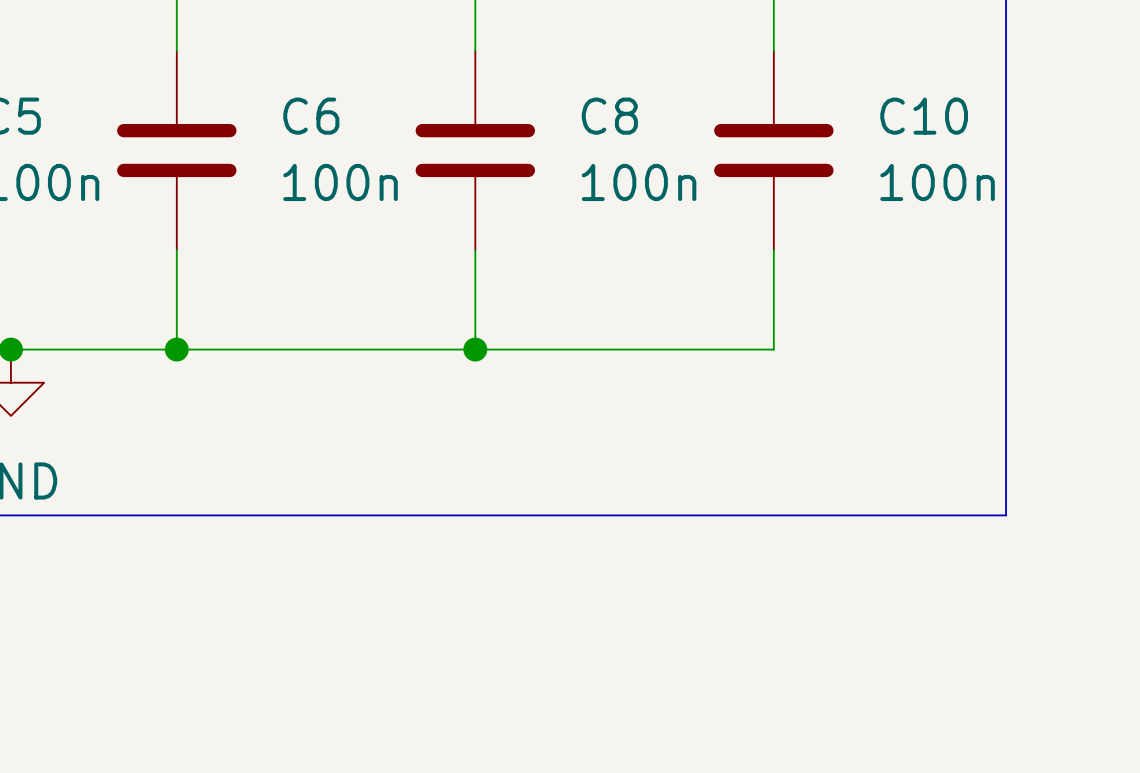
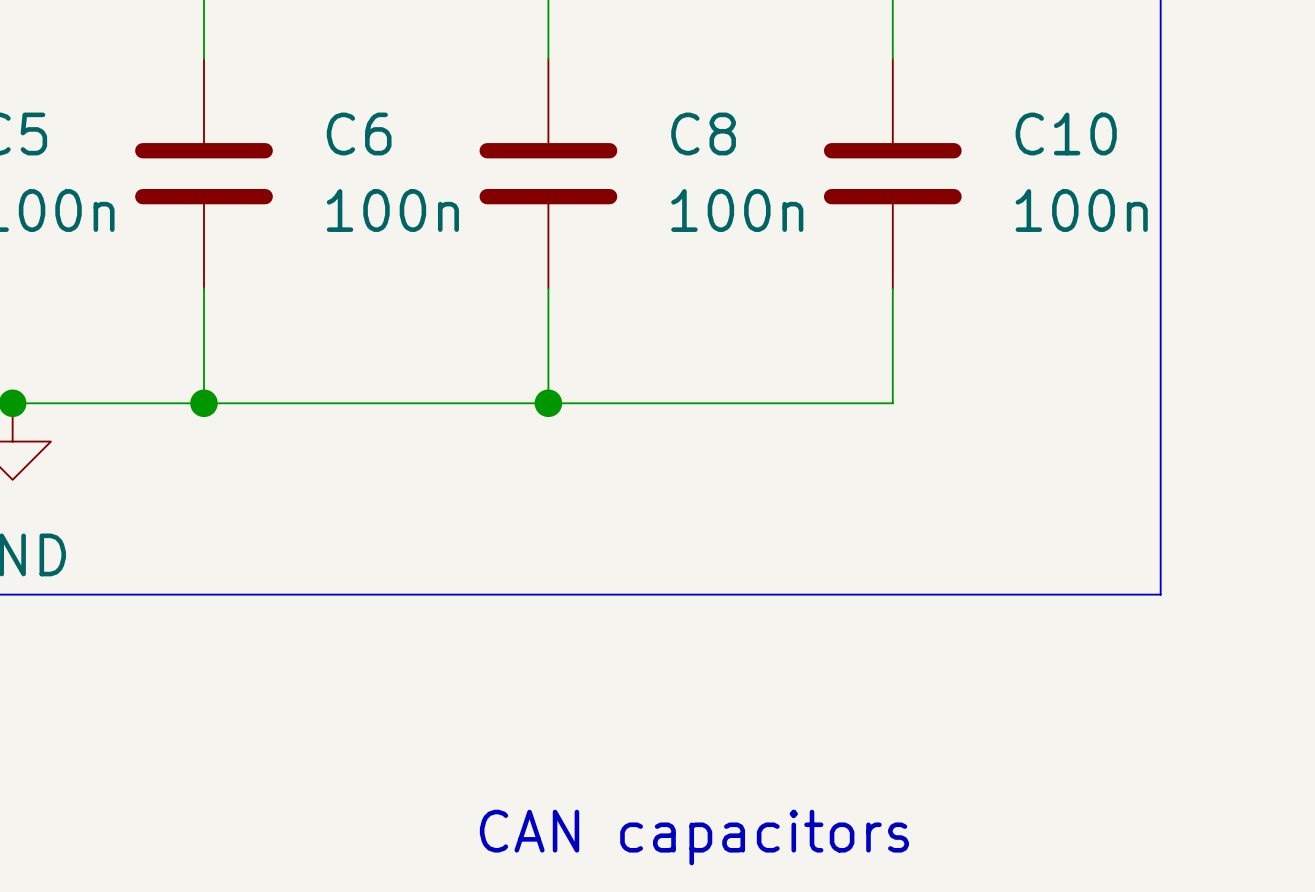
text: none -> CAN capacitors (694, 837)

